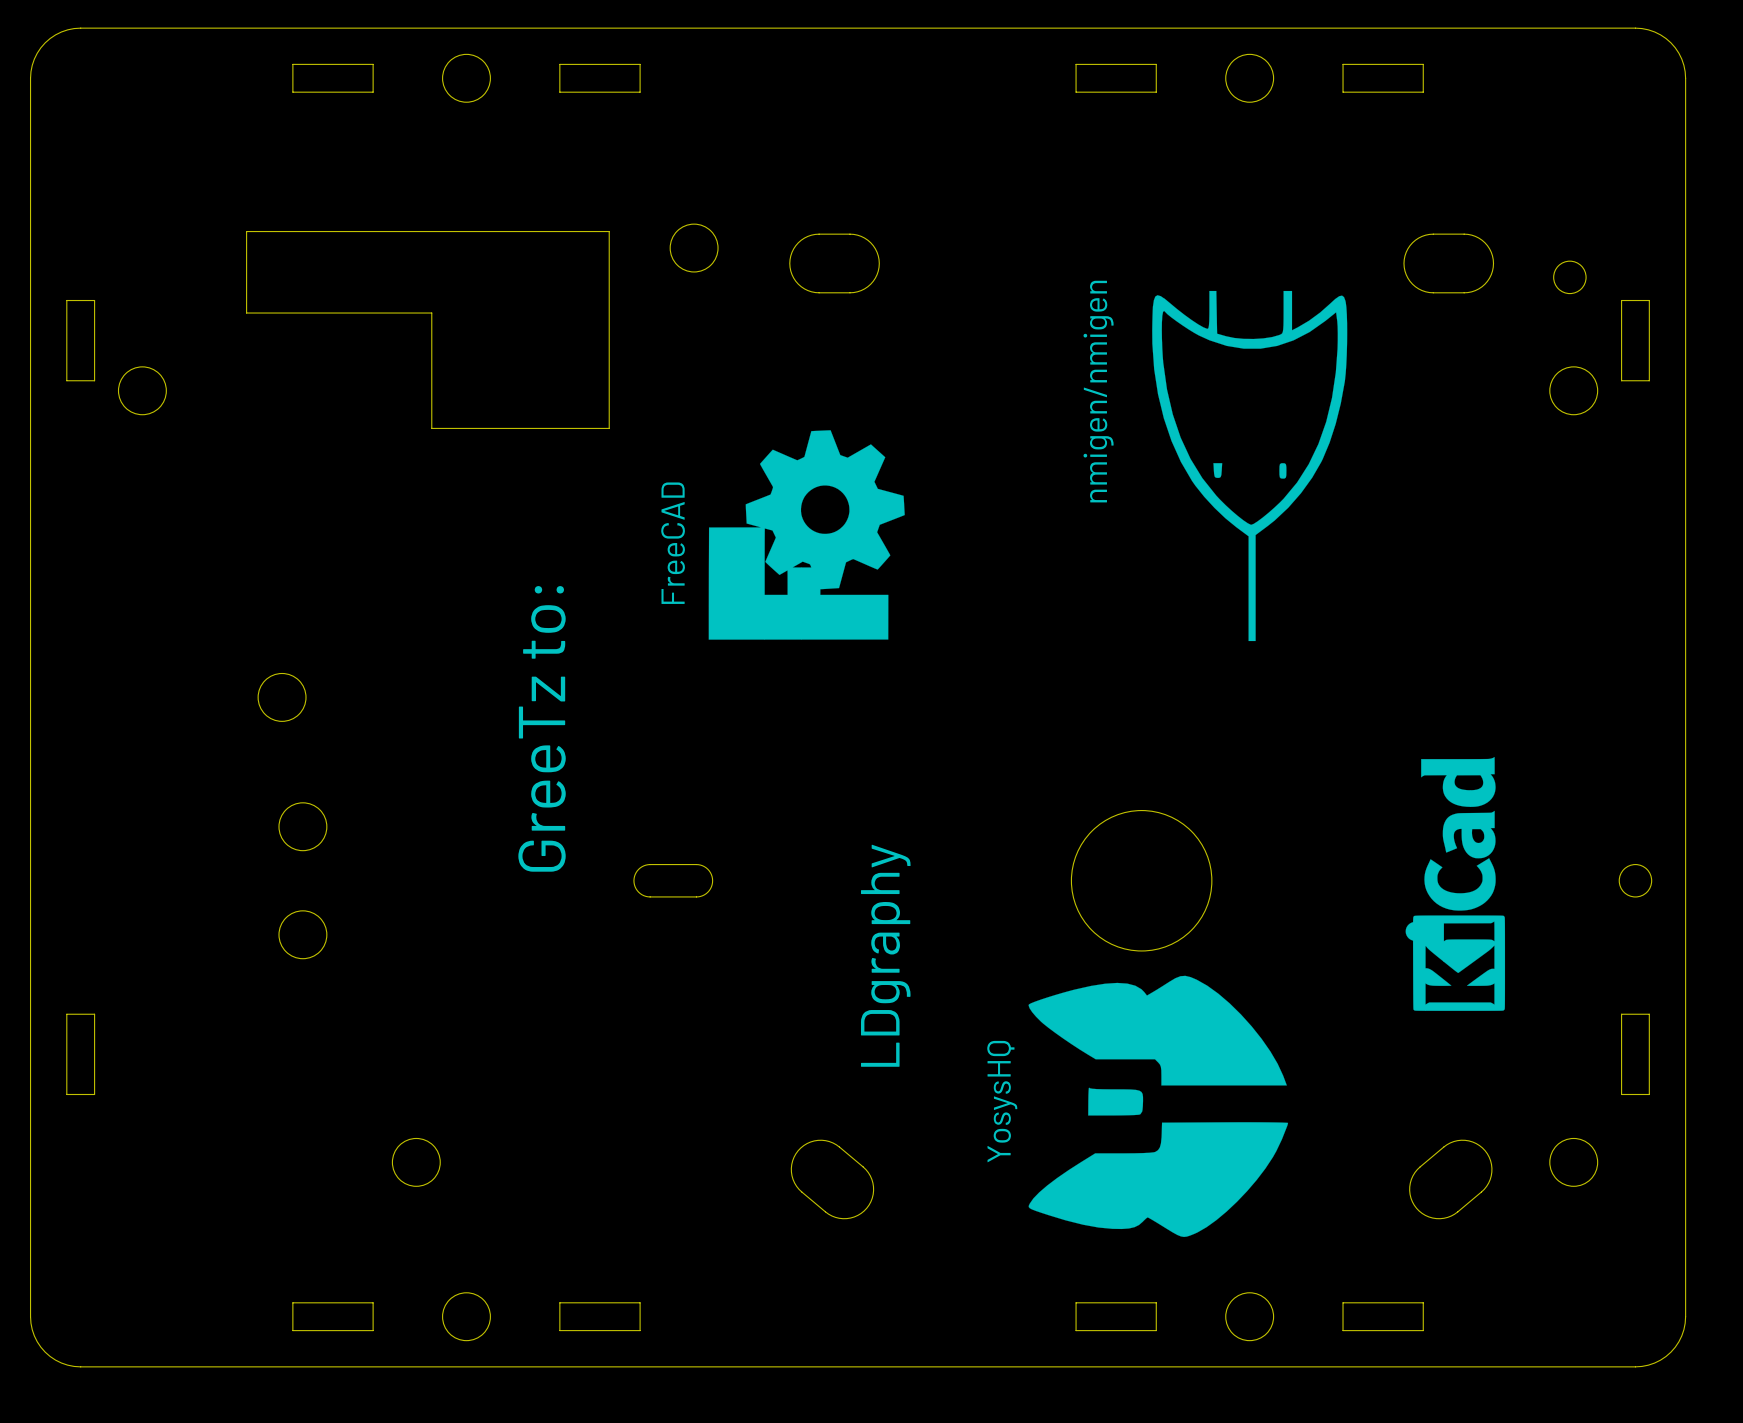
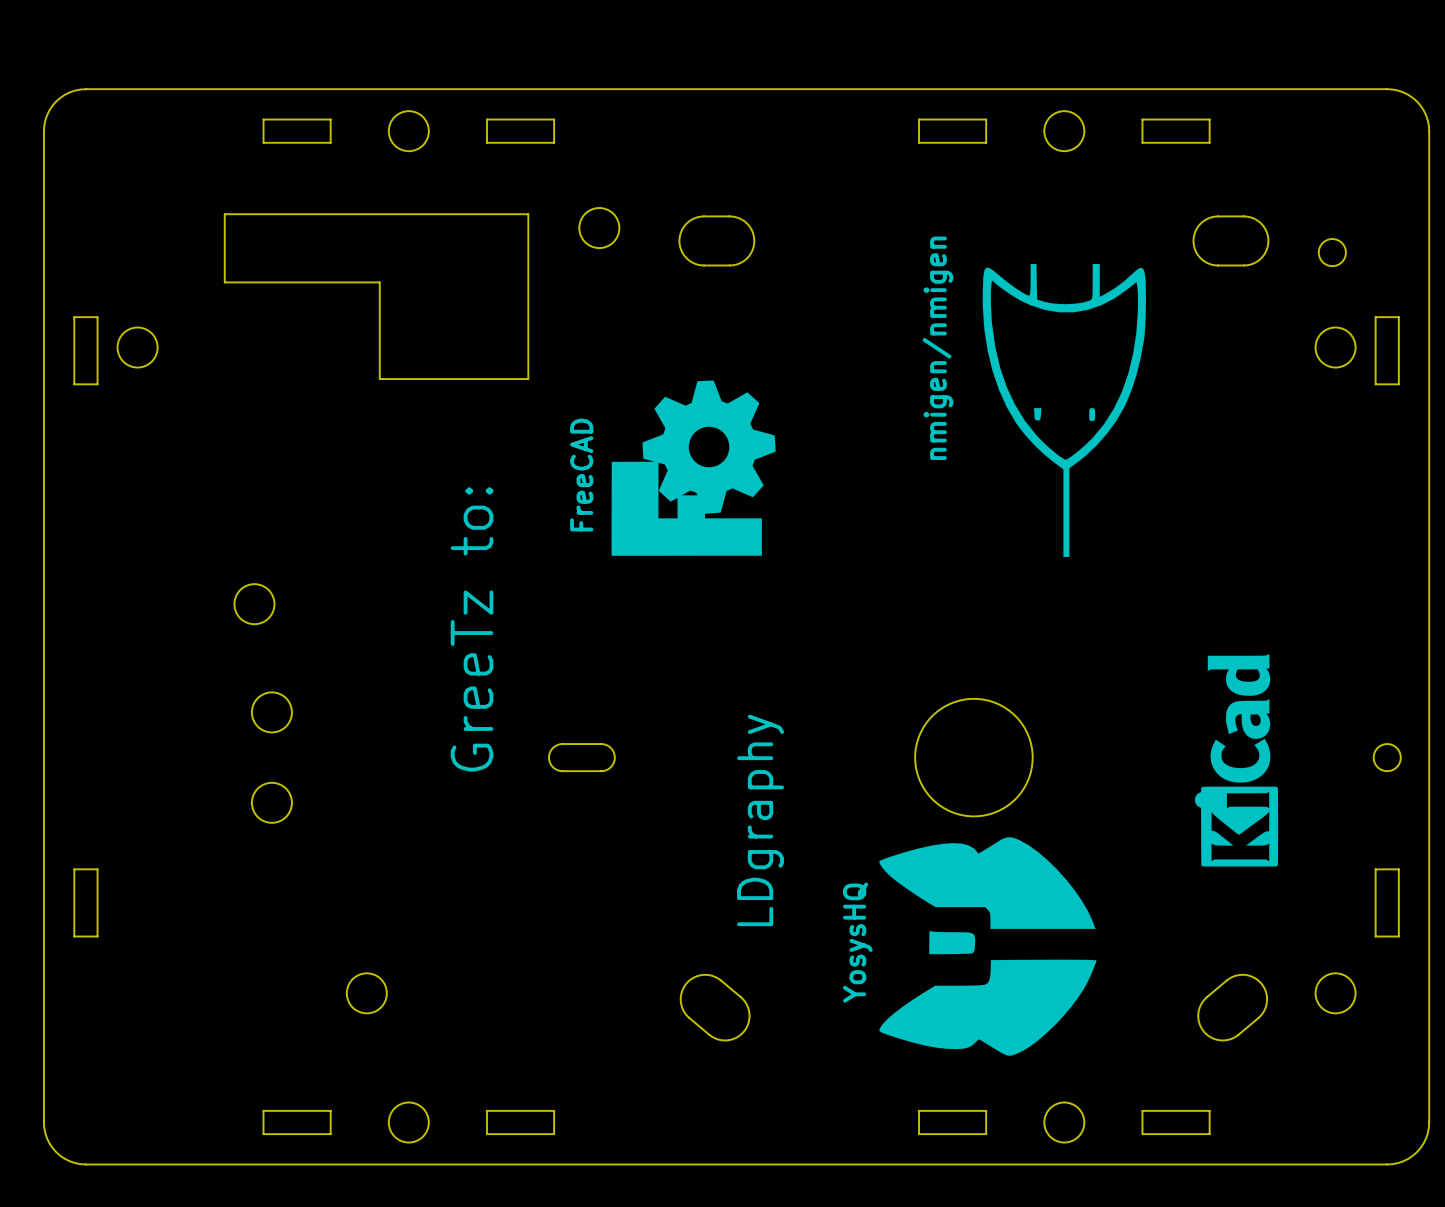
board edge: (373, 64) (292, 64) (292, 92) (373, 92) (373, 64) -> (330, 119) (263, 119) (263, 142) (330, 142) (330, 119)
board edge: (640, 64) (559, 64) (559, 92) (640, 92) (640, 64) -> (554, 119) (486, 119) (486, 142) (554, 142) (554, 119)
board edge: (1156, 64) (1076, 64) (1076, 92) (1156, 92) (1156, 64) -> (986, 119) (919, 119) (919, 142) (986, 142) (986, 119)
board edge: (1423, 64) (1343, 64) (1343, 92) (1423, 92) (1423, 64) -> (1209, 119) (1142, 119) (1142, 142) (1209, 142) (1209, 119)
round board edge position: (466, 78) -> (408, 131)
round board edge position: (1249, 78) -> (1064, 131)
board edge: (1685, 132) (1685, 78) (1681, 59) (1675, 47) (1660, 34) (1648, 29) (1635, 28) (80, 28) (67, 29) (50, 38) (40, 47) (34, 59) (30, 78) (30, 132) -> (1429, 131) (1426, 115) (1416, 101) (1403, 92) (1387, 89) (85, 89) (69, 92) (56, 101) (47, 115) (43, 131)
board edge: (94, 354) (94, 300) (66, 300) (66, 354) -> (97, 317) (74, 317)
board edge: (1649, 354) (1649, 300) (1621, 300) (1621, 354) -> (1398, 317) (1375, 317)
board edge: (94, 380) (66, 380) -> (97, 339) (97, 384) (74, 384) (74, 339)
board edge: (1649, 380) (1621, 380) -> (1398, 339) (1398, 384) (1375, 384) (1375, 339)

